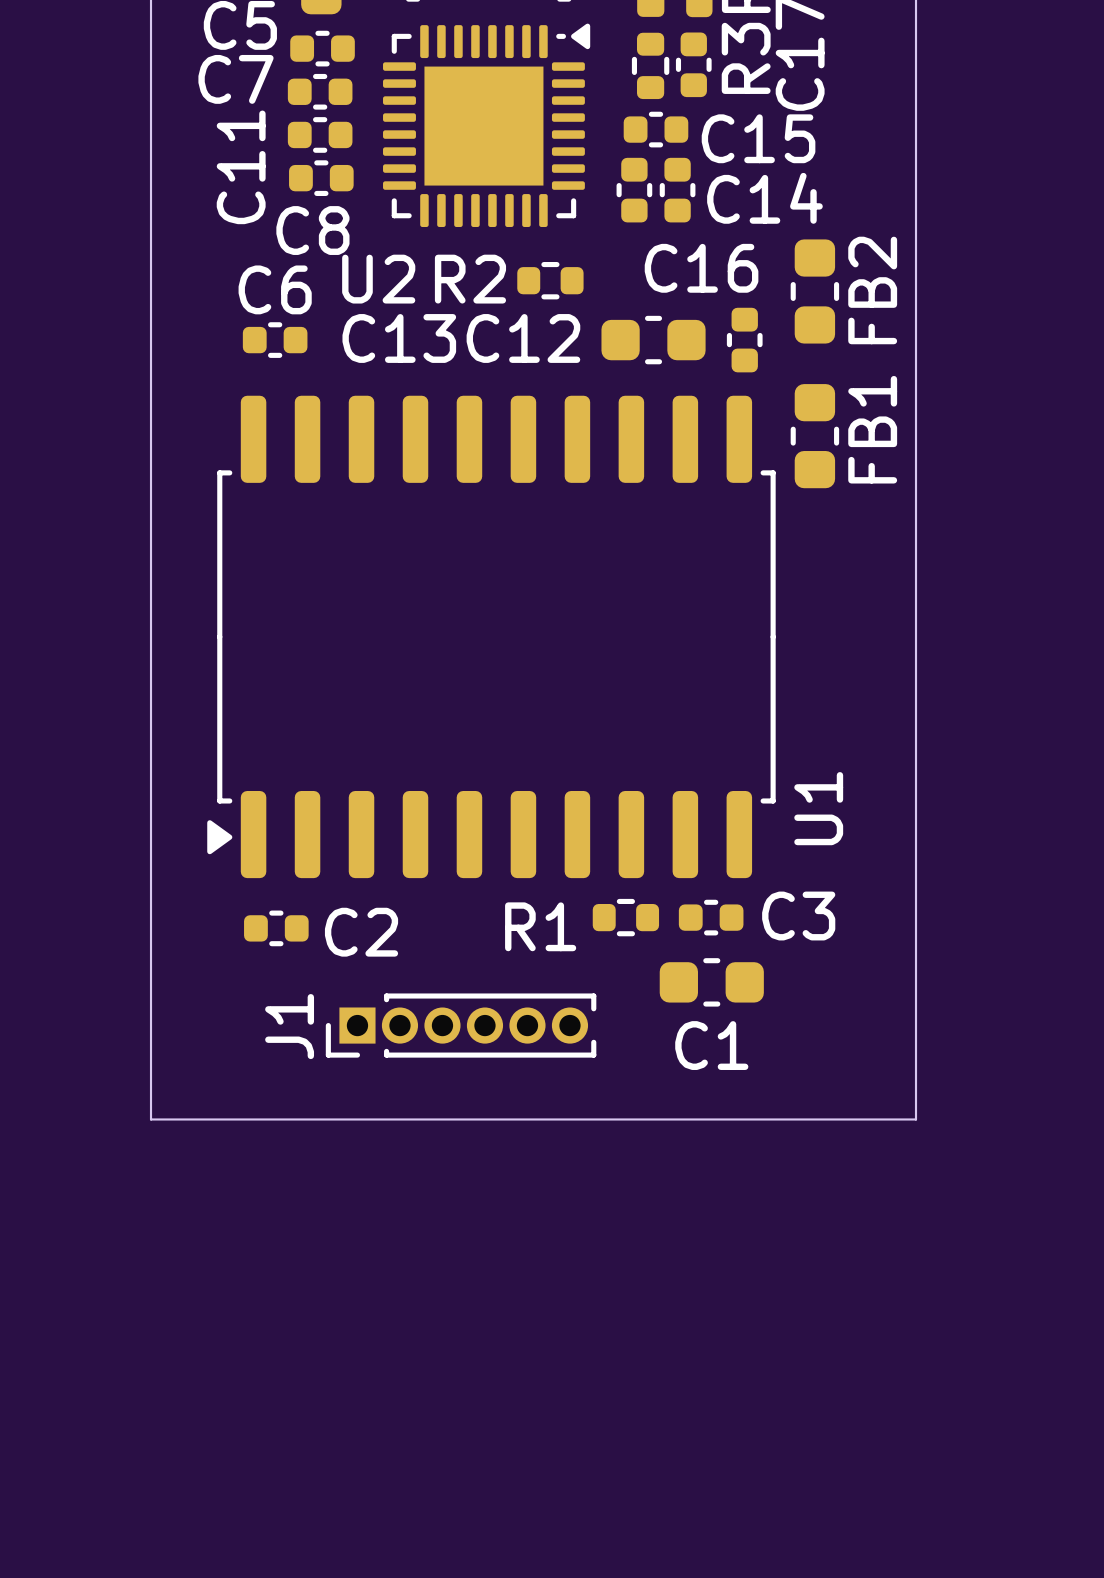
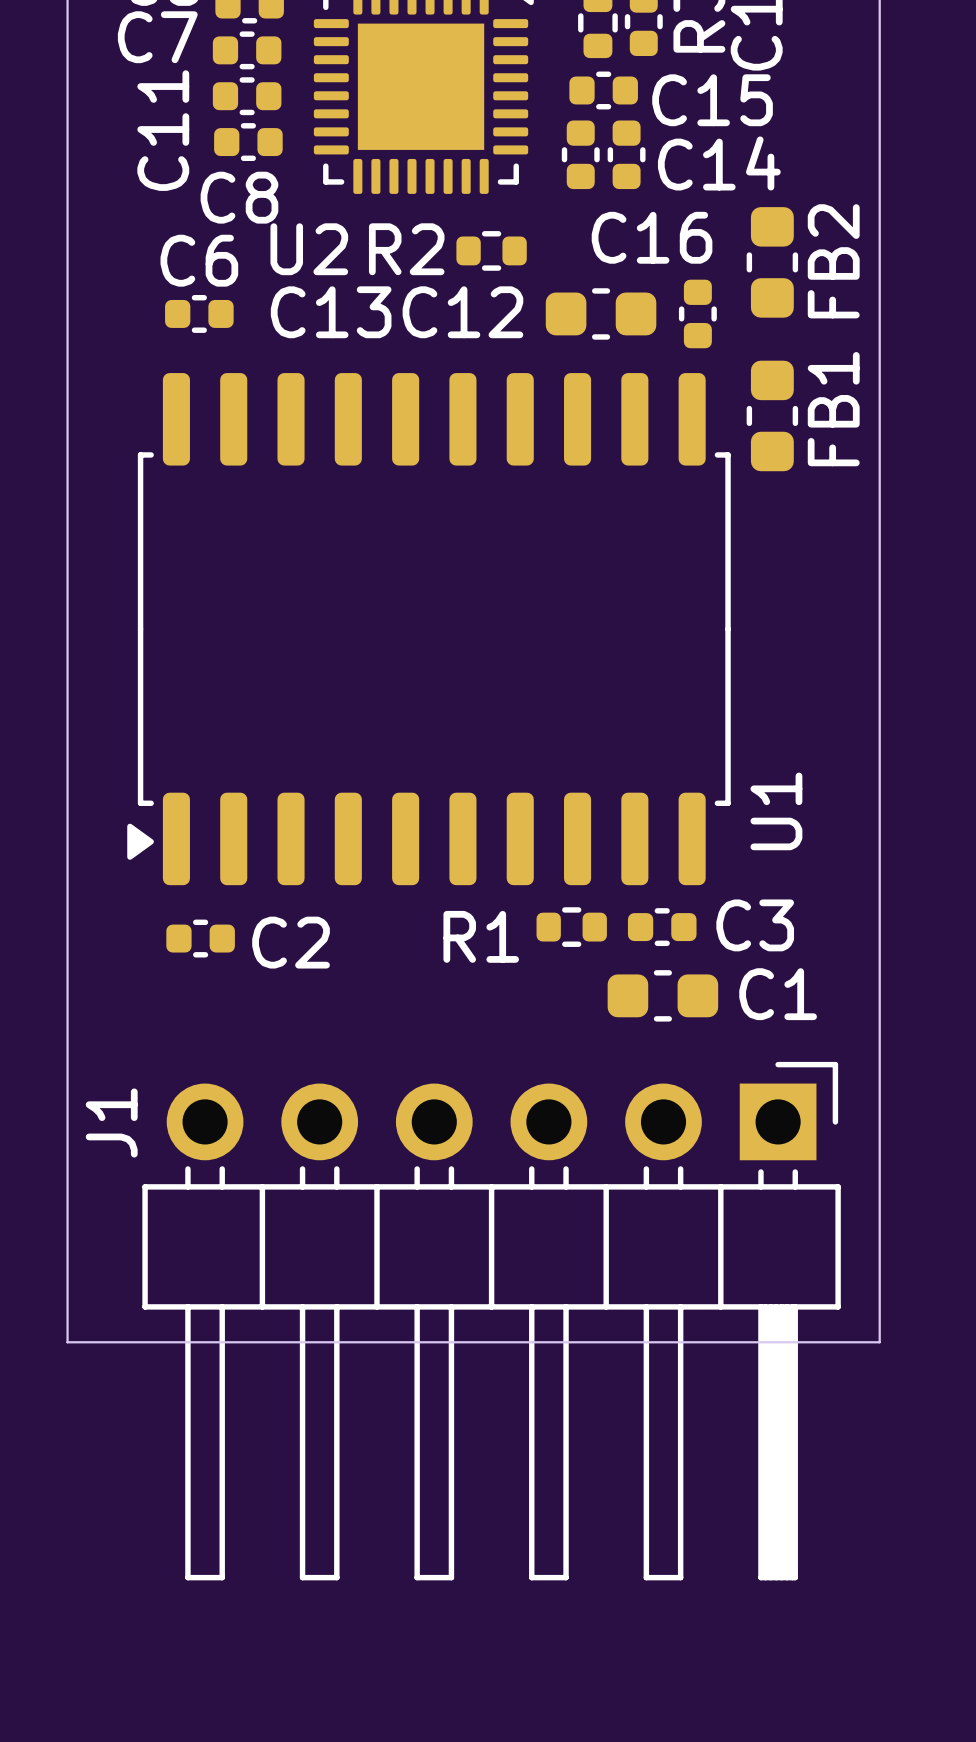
J1 footprint: [325, 993, 597, 1058] -> [142, 1061, 841, 1581]
J1 name position: J1 (289, 1026) -> J1 (111, 1122)
C1 name position: C1 (711, 1045) -> C1 (778, 994)
board edge: (151, 1119) (916, 1119) -> (67, 1141) (67, 1342) (879, 1342) (879, 1141)

